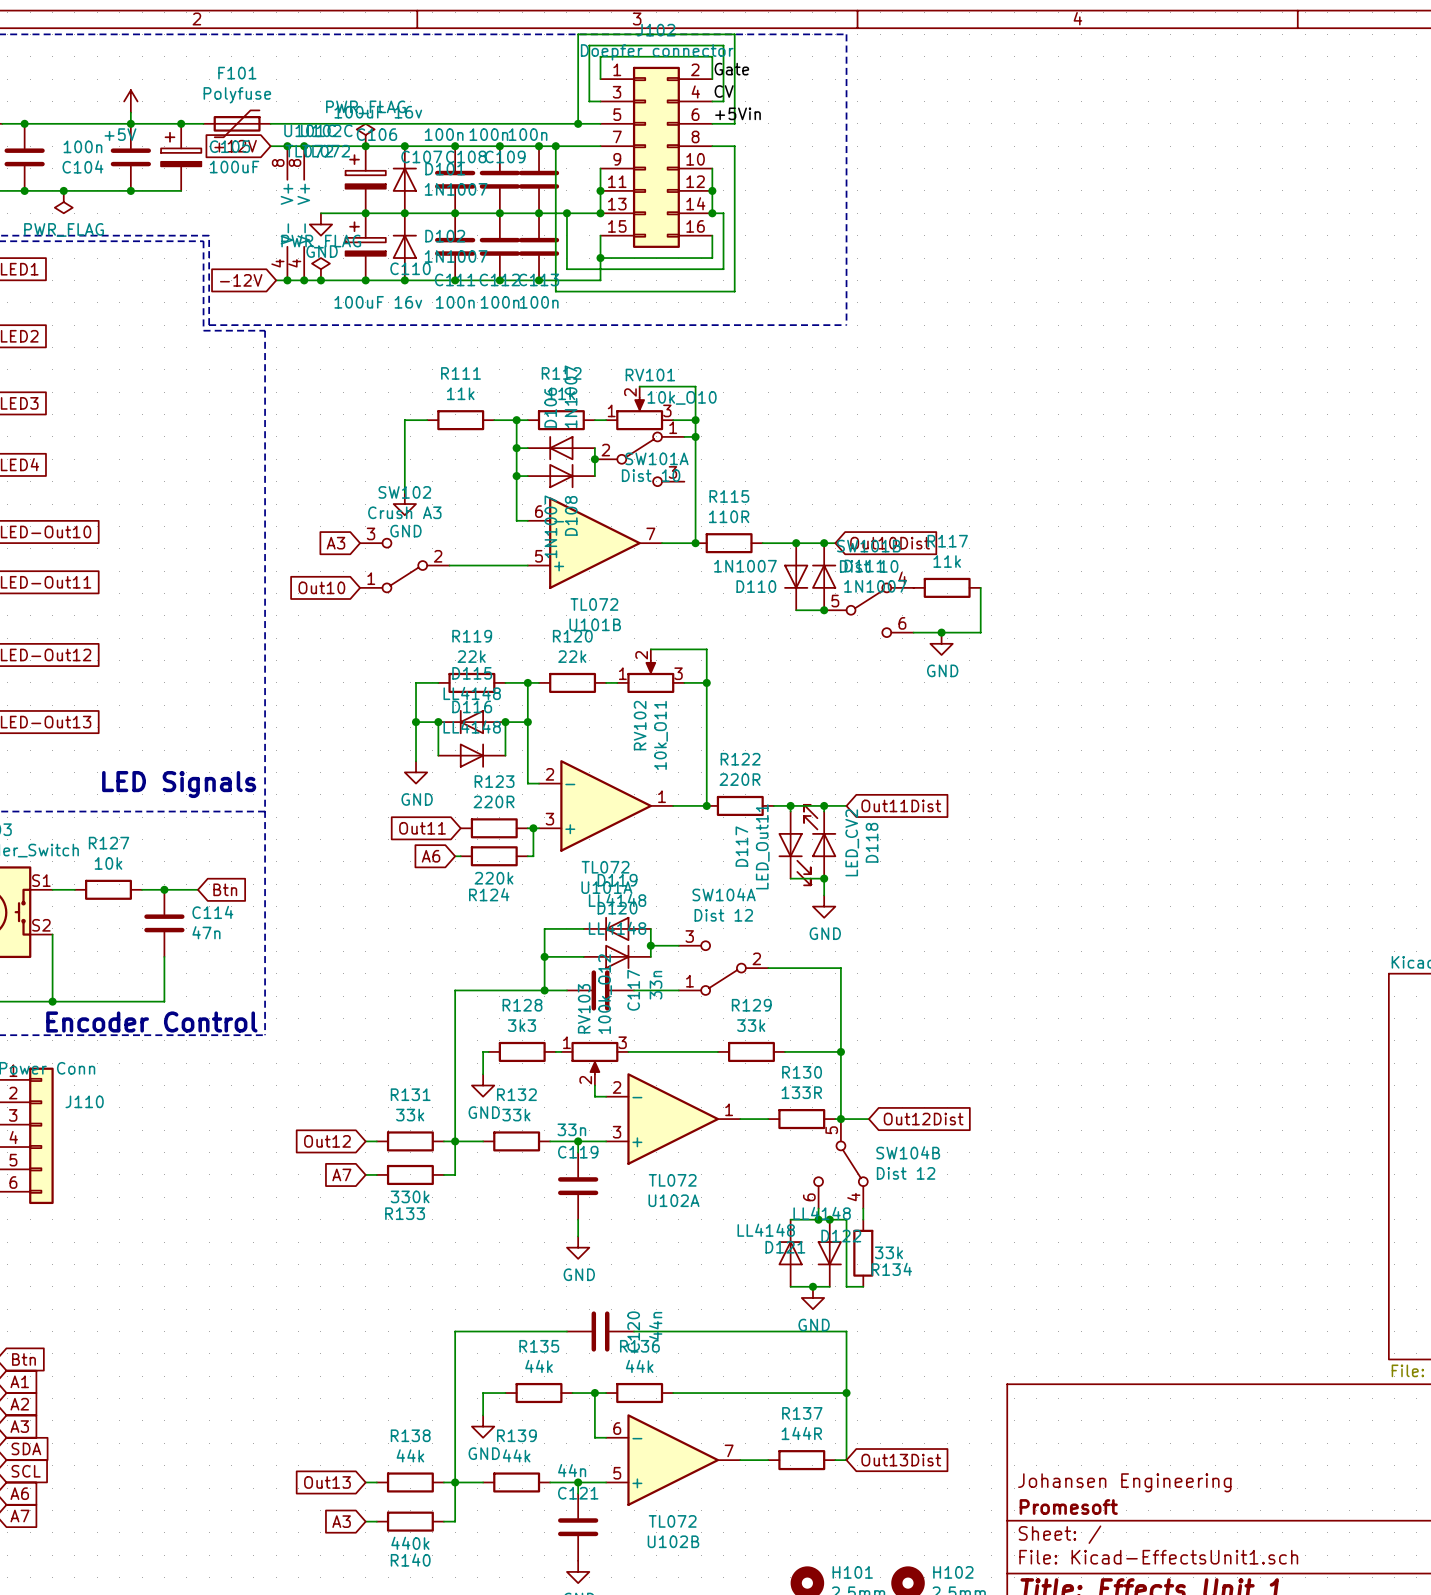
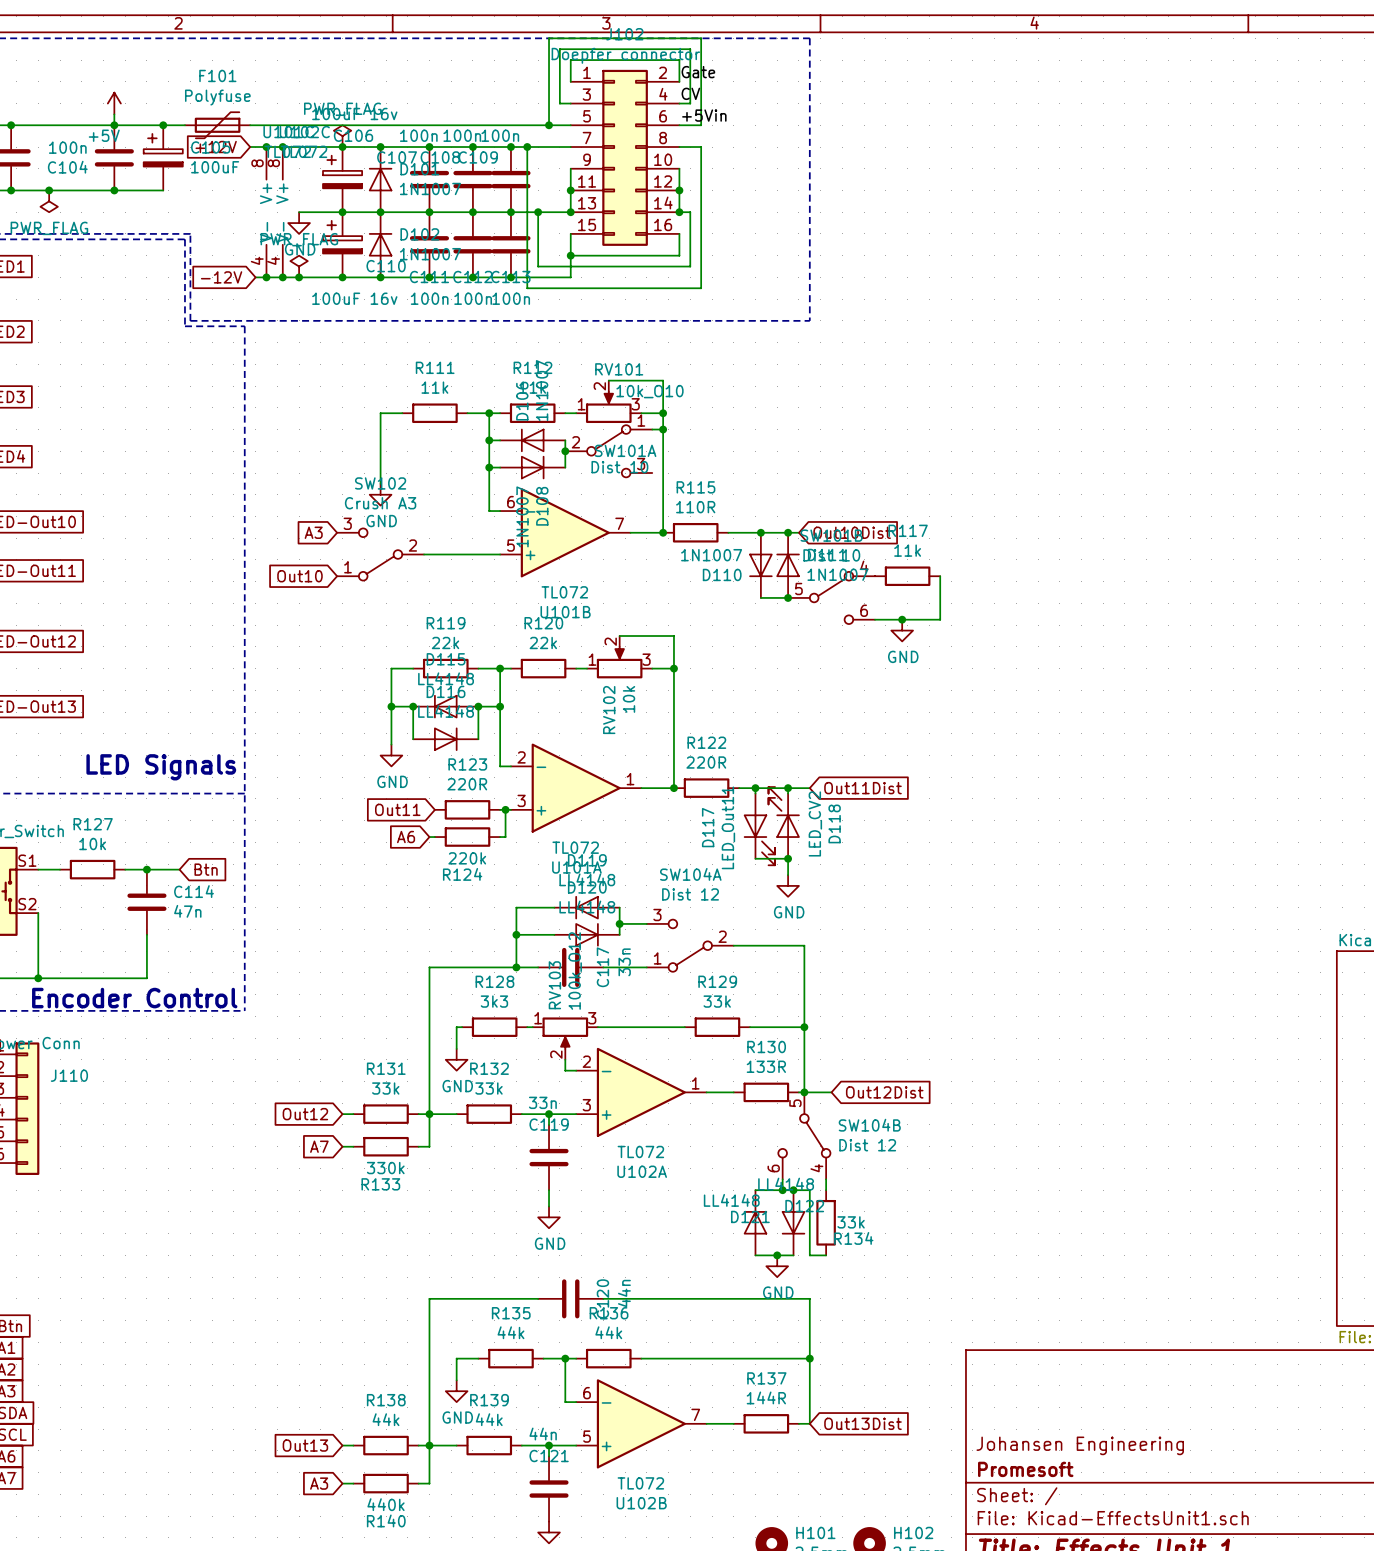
RV102 value: 10k_O11 (661, 735) -> 10k (629, 699)

